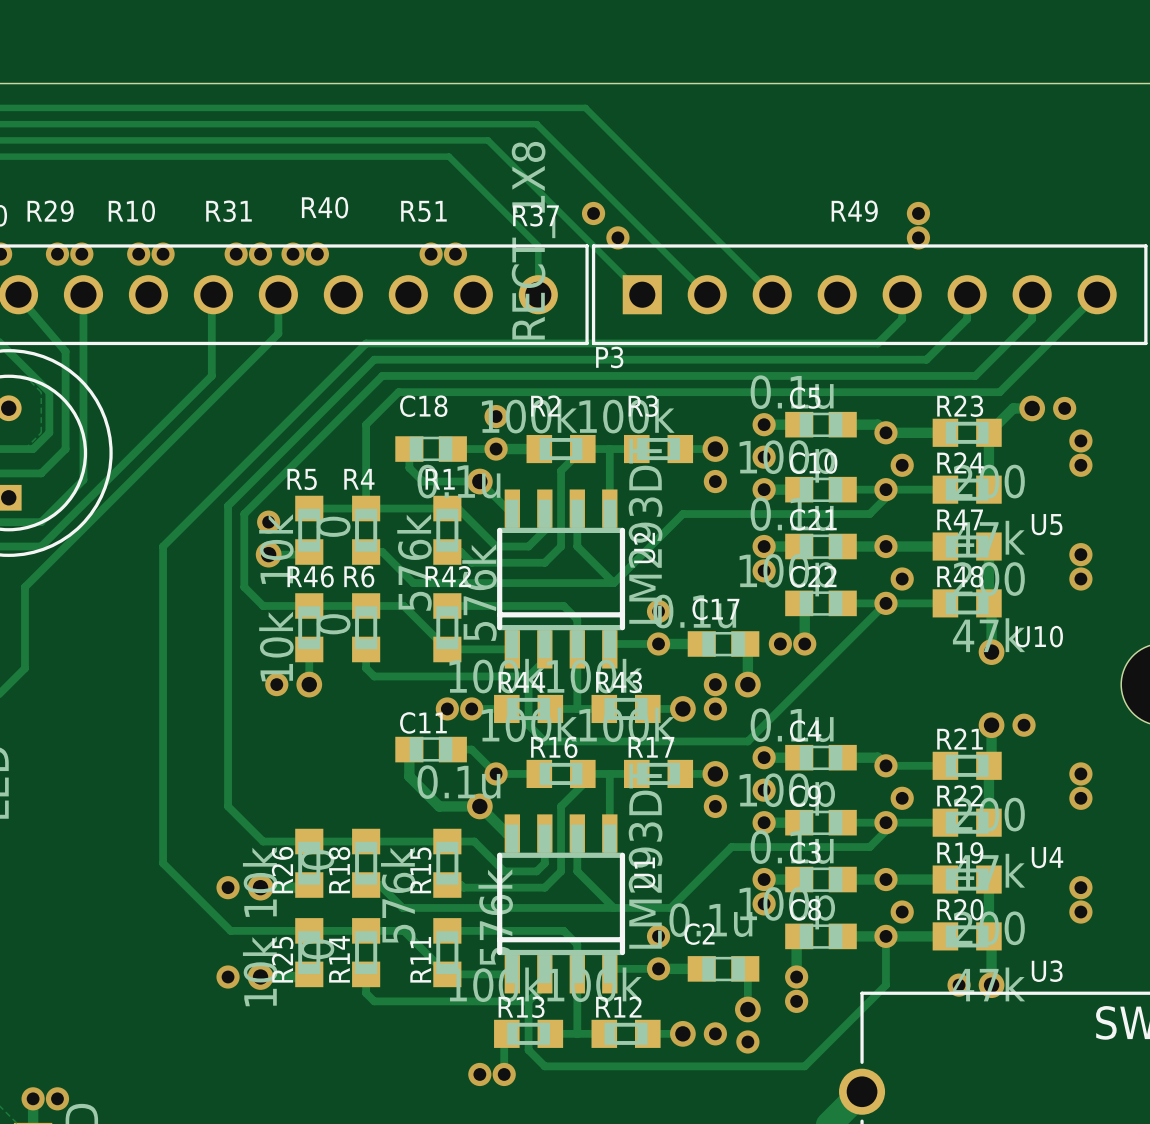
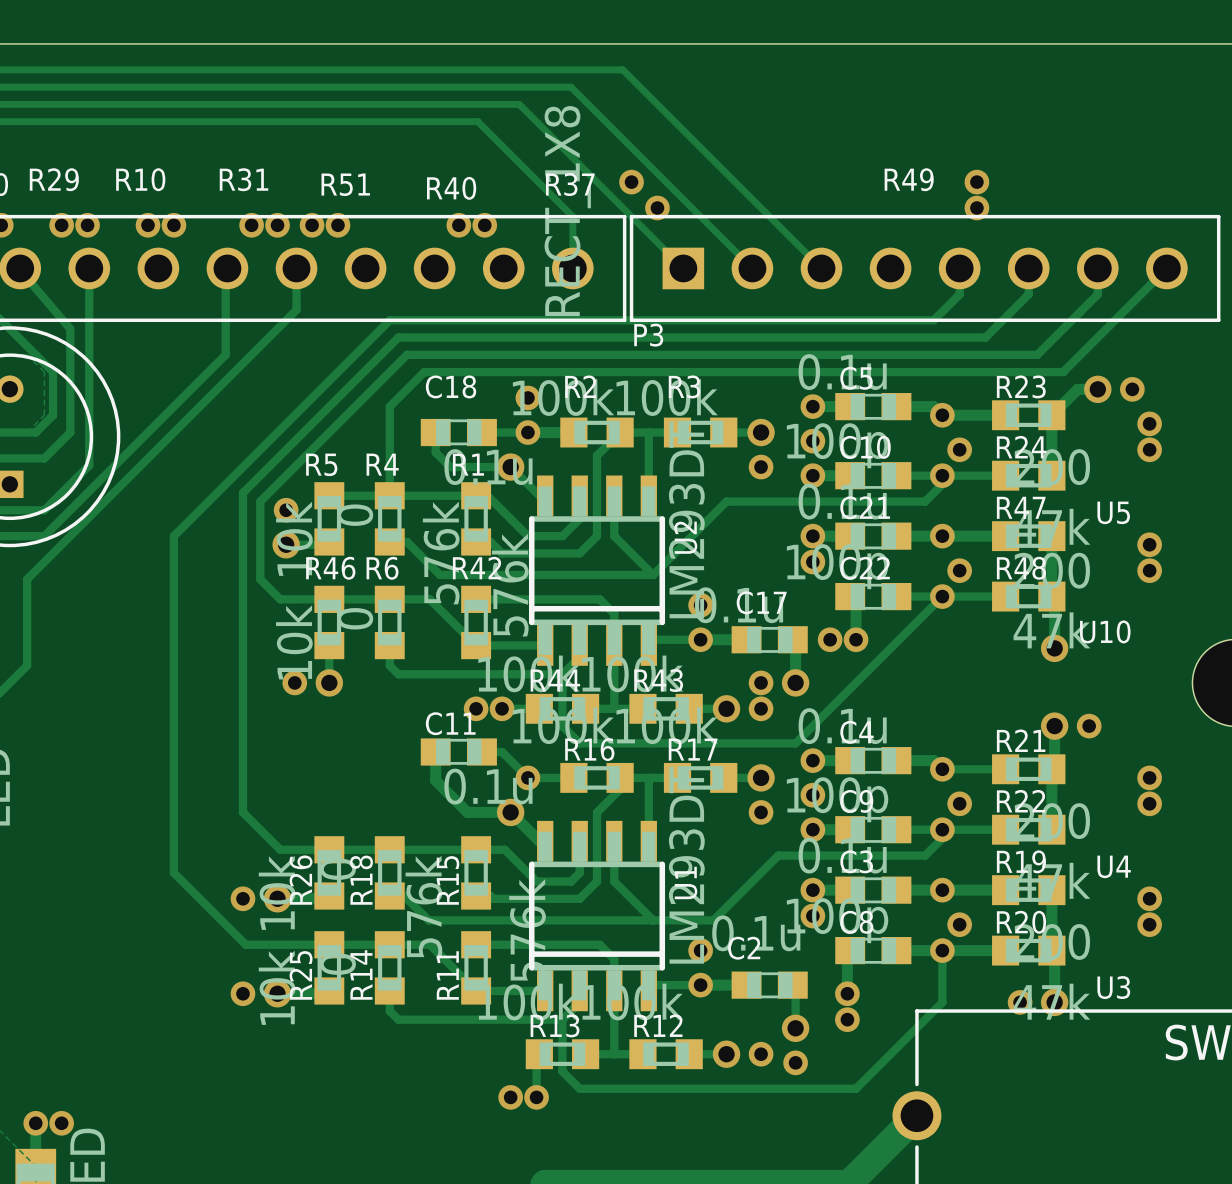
R40 position: (325, 207) -> (451, 188)
R51 position: (423, 211) -> (345, 184)

